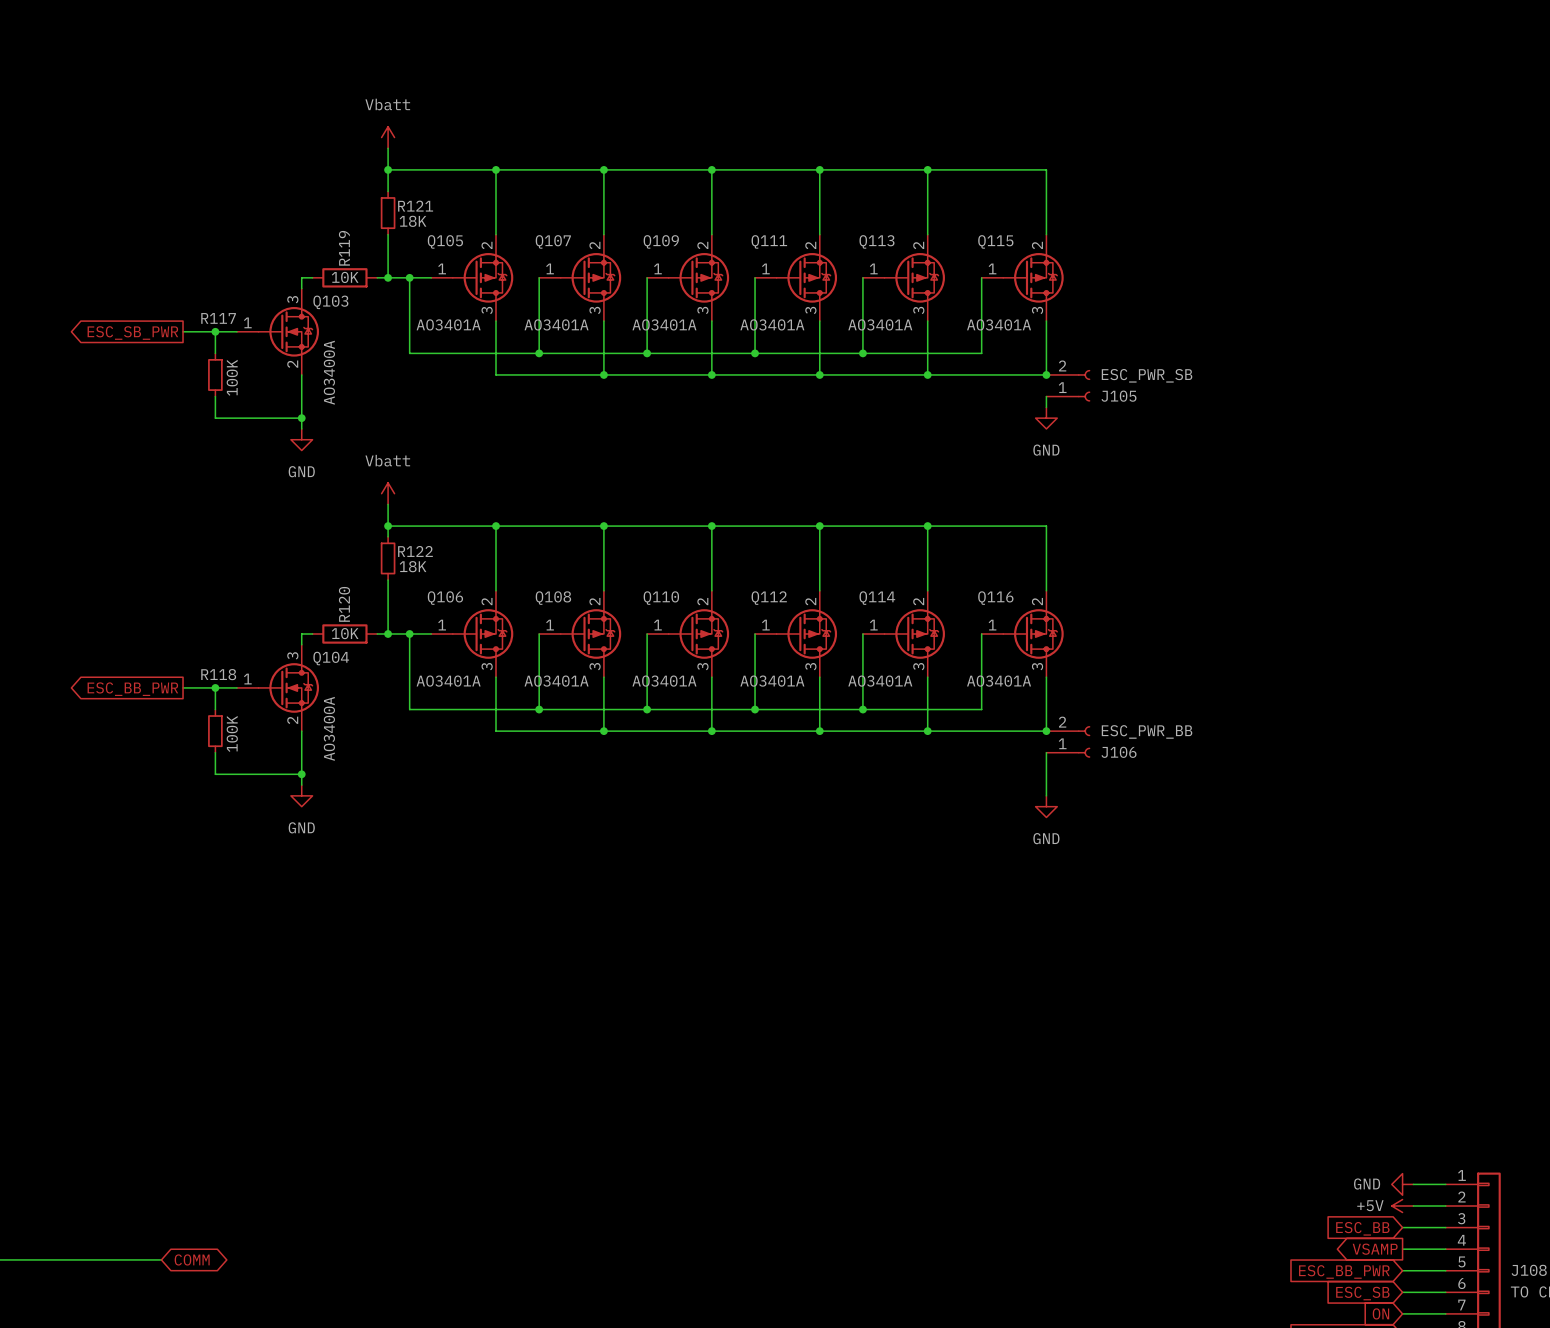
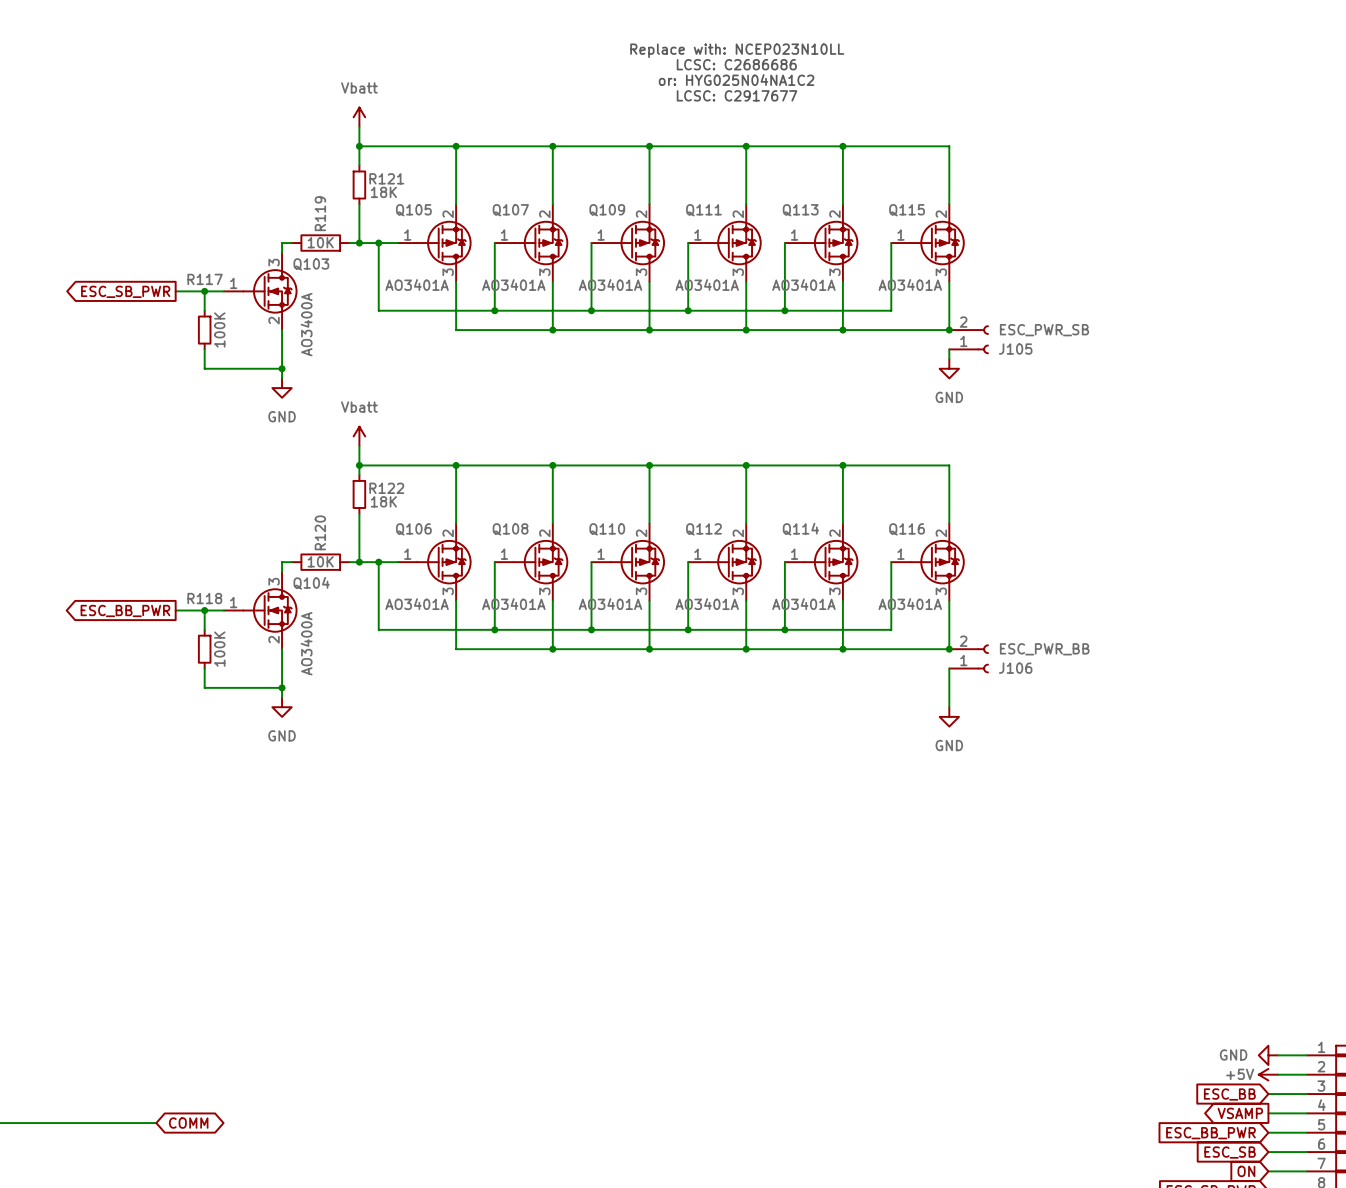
text: none -> Replace with: NCEP023N10LL (737, 50)
text: none -> LCSC: C2686686 (736, 64)
text: none -> or: HYG025N04NA1C2 (736, 80)
text: none -> LCSC: C2917677 (737, 95)

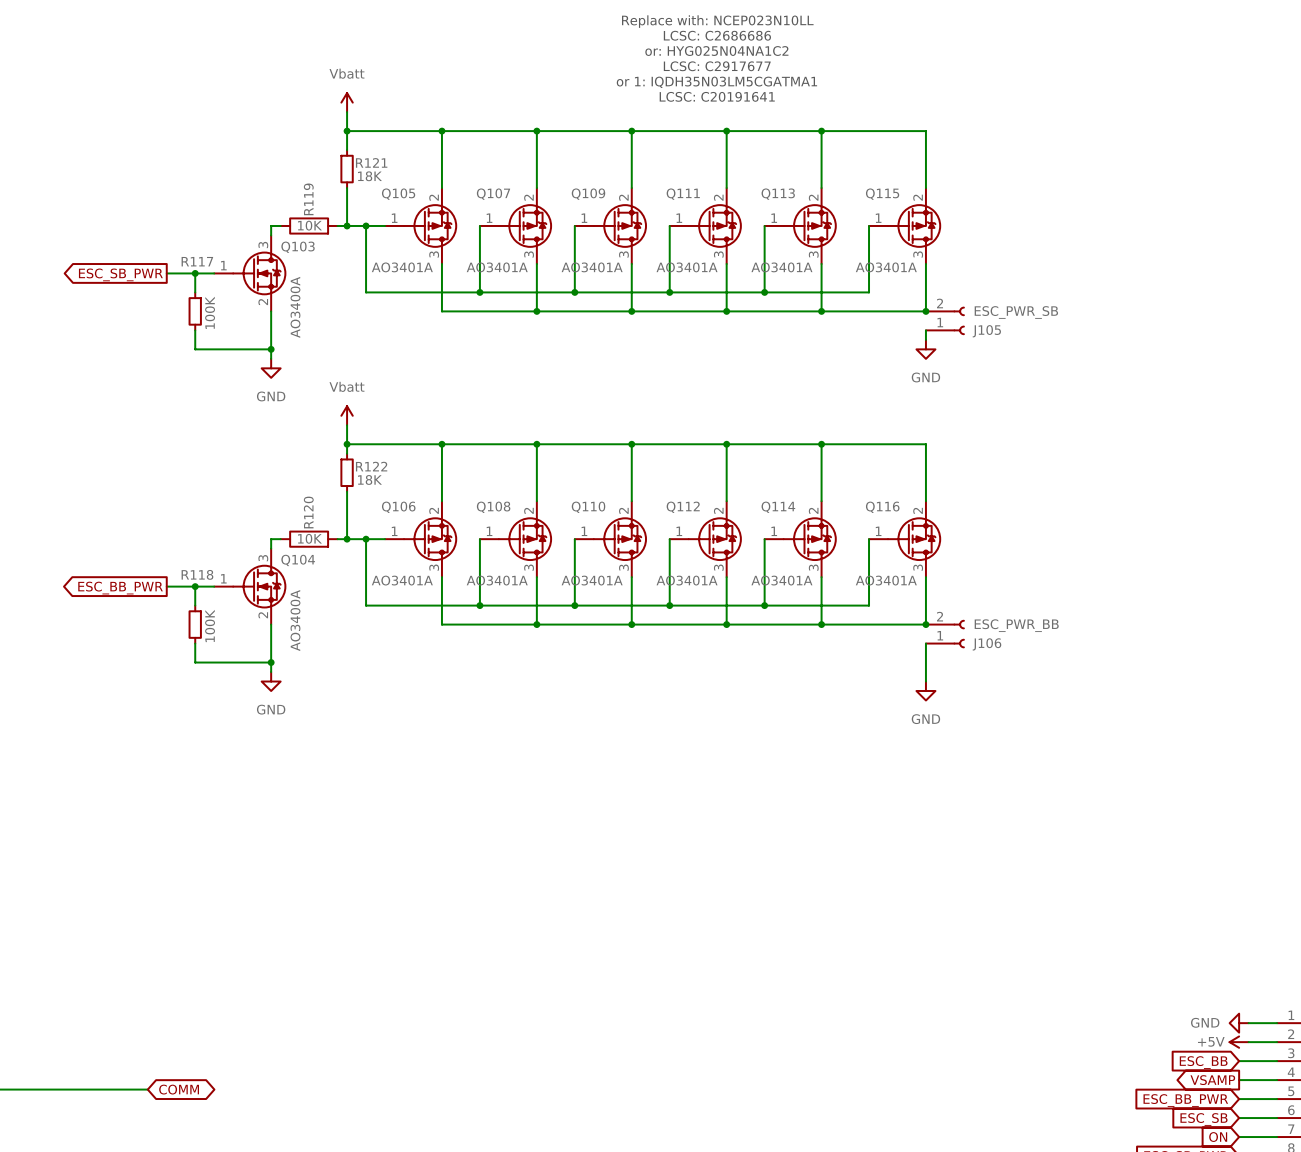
text: none -> Replace with: NCEP023N10LL (717, 21)
text: Replace with: NCEP023N10LL (737, 50) -> LCSC: C2686686 (717, 35)
text: LCSC: C2686686 (736, 64) -> or: HYG025N04NA1C2 (716, 51)
text: or: HYG025N04NA1C2 (736, 80) -> LCSC: C2917677 (717, 66)
text: LCSC: C2917677 (737, 95) -> or 1: IQDH35N03LM5CGATMA1 (716, 82)
text: none -> LCSC: C20191641 (717, 96)

